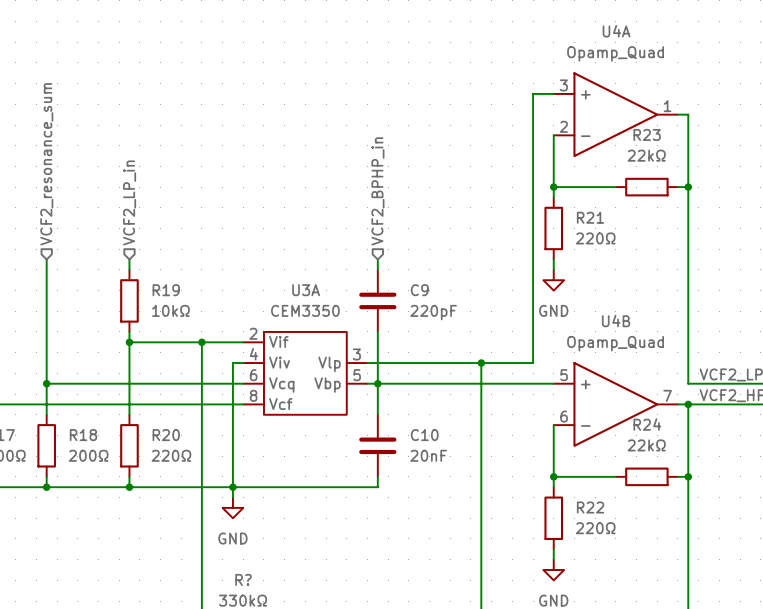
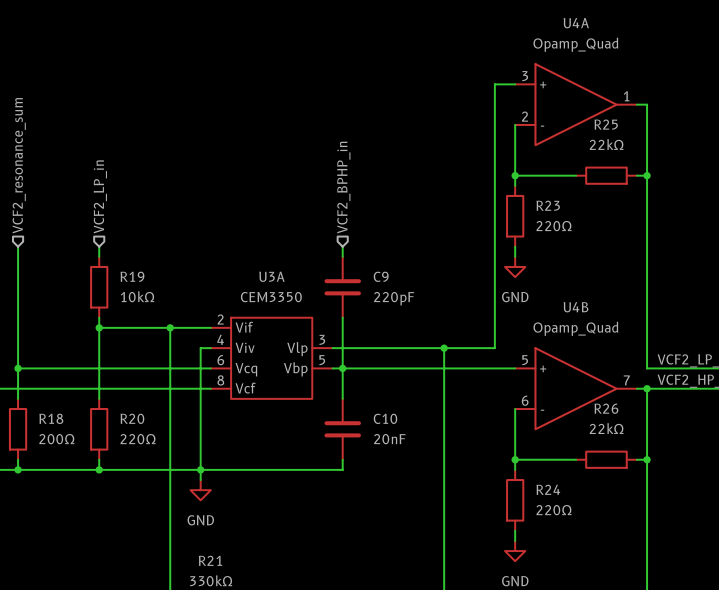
R23 name: R23 (647, 134) -> R25 (606, 124)
R21 name: R21 (590, 217) -> R23 (548, 205)
R24 name: R24 (647, 424) -> R26 (606, 408)
R22 name: R22 (590, 507) -> R24 (548, 489)
R? name: R? (243, 579) -> R21 (210, 560)

